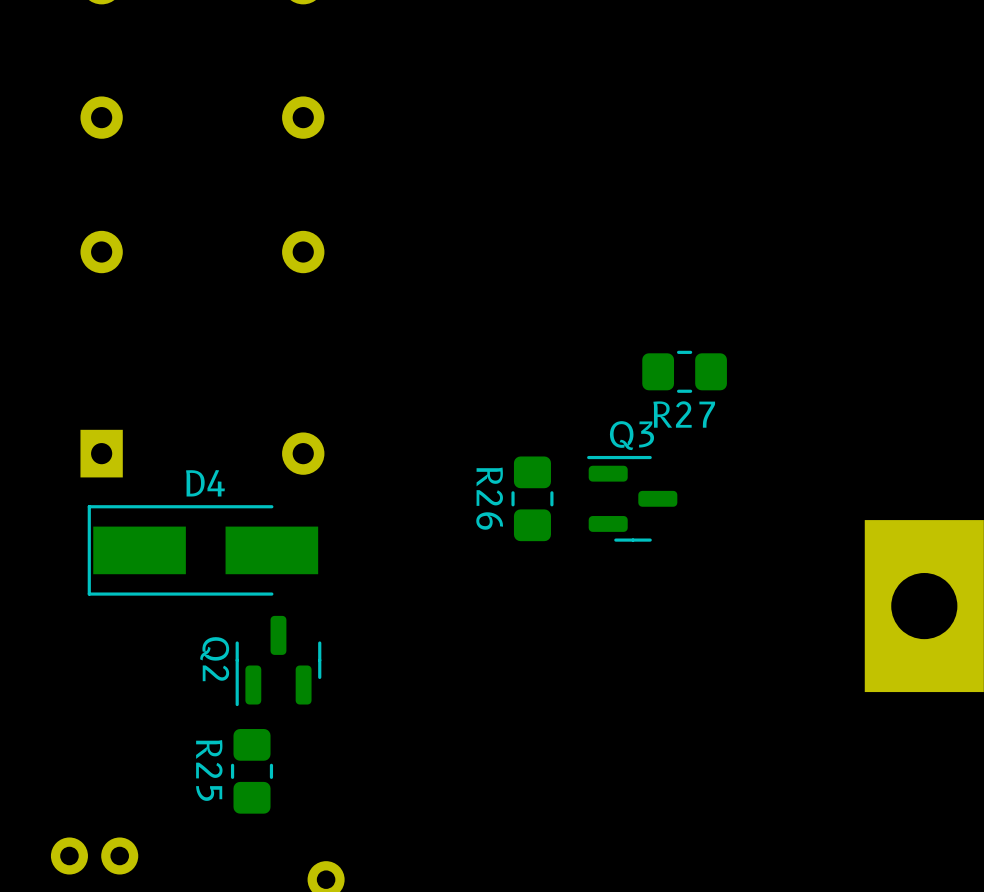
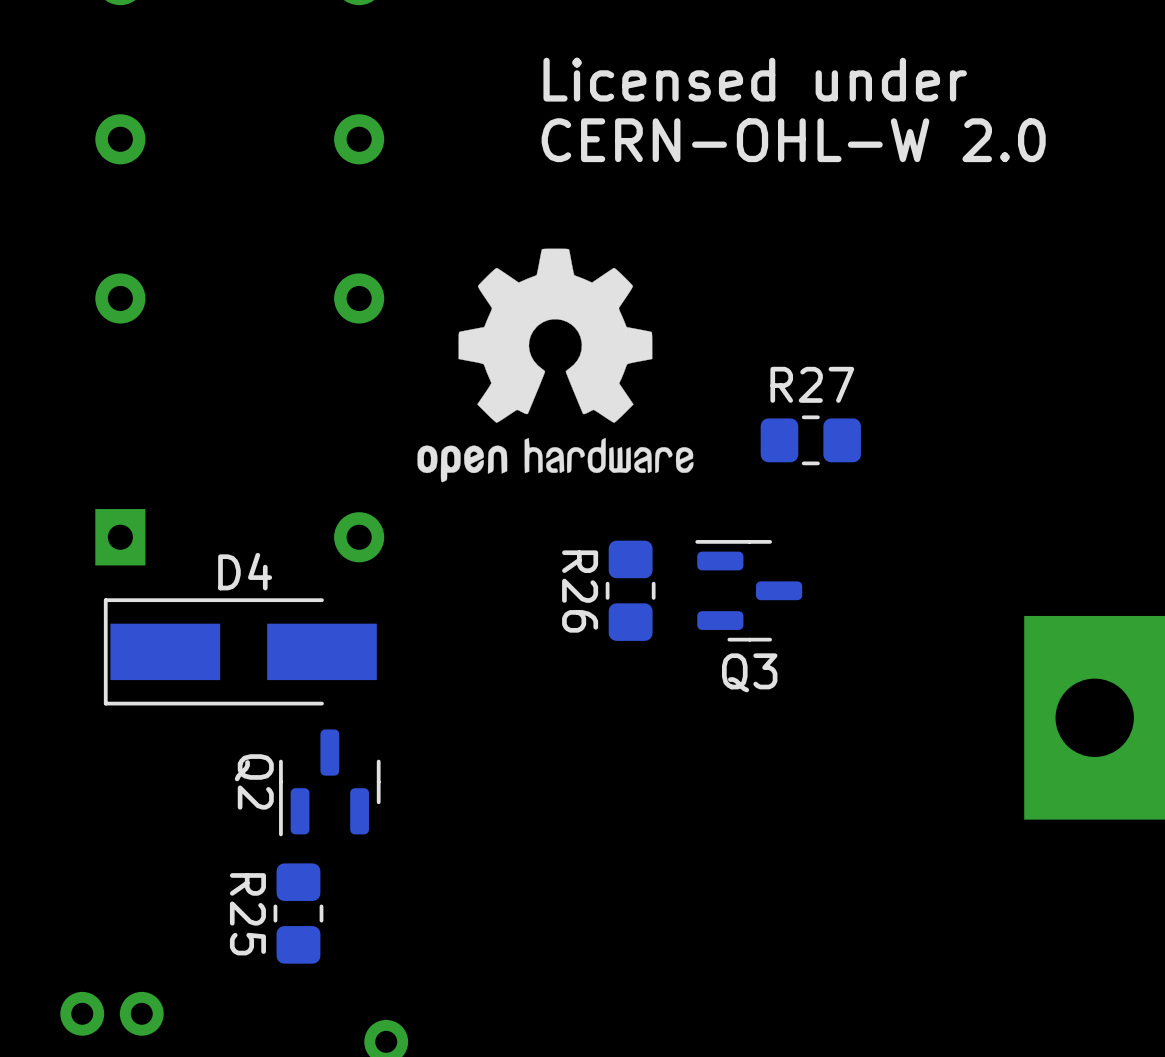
text: none -> Licensed under (755, 79)
text: none -> CERN-OHL-W 2.0 (793, 140)
drawing: none -> [417, 248, 694, 483]
R27 name position: R27 (684, 414) -> R27 (812, 384)
Q3 name position: Q3 (631, 435) -> Q3 (749, 672)

